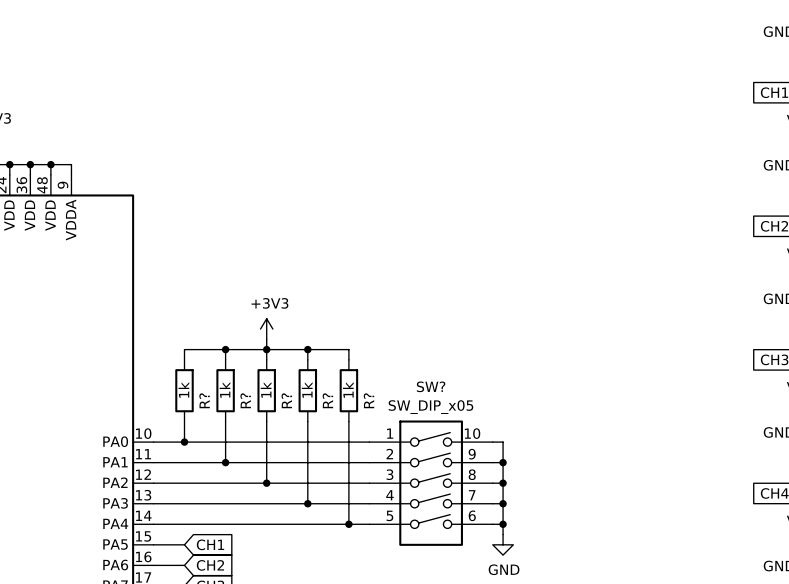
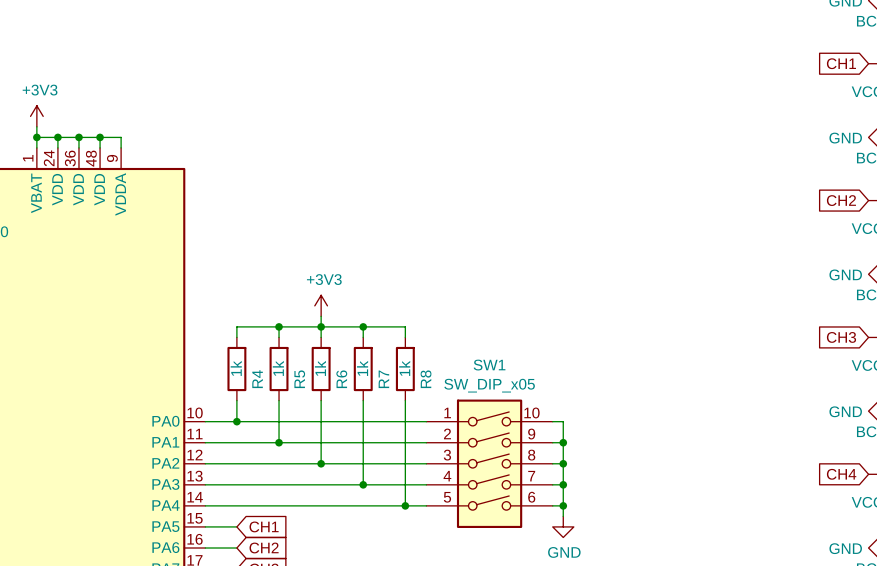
SW? name: SW? (431, 386) -> SW1 (489, 365)
R? name: R? (204, 400) -> R4 (257, 379)
R? name: R? (245, 400) -> R5 (299, 379)
R? name: R? (286, 400) -> R6 (341, 379)
R? name: R? (327, 400) -> R7 (383, 379)
R? name: R? (368, 400) -> R8 (426, 379)

